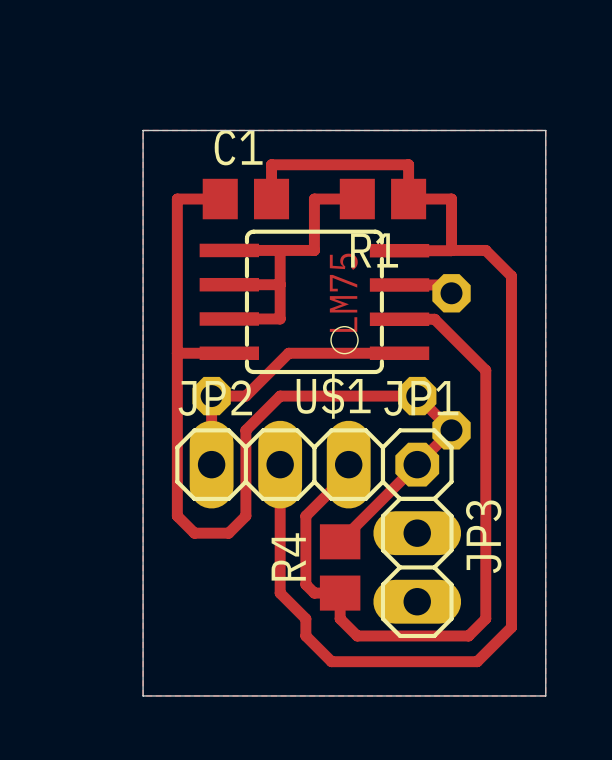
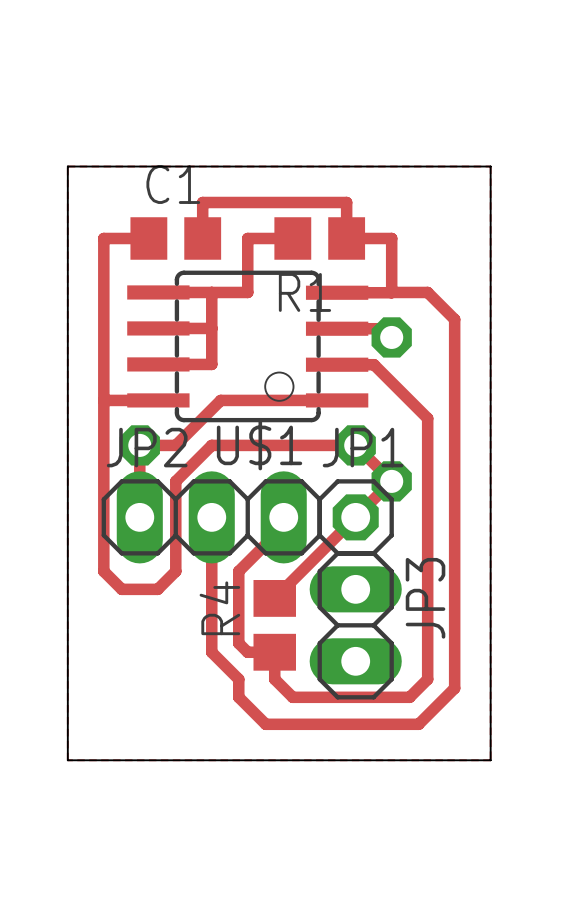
text: LM75 (343, 292) -> none

